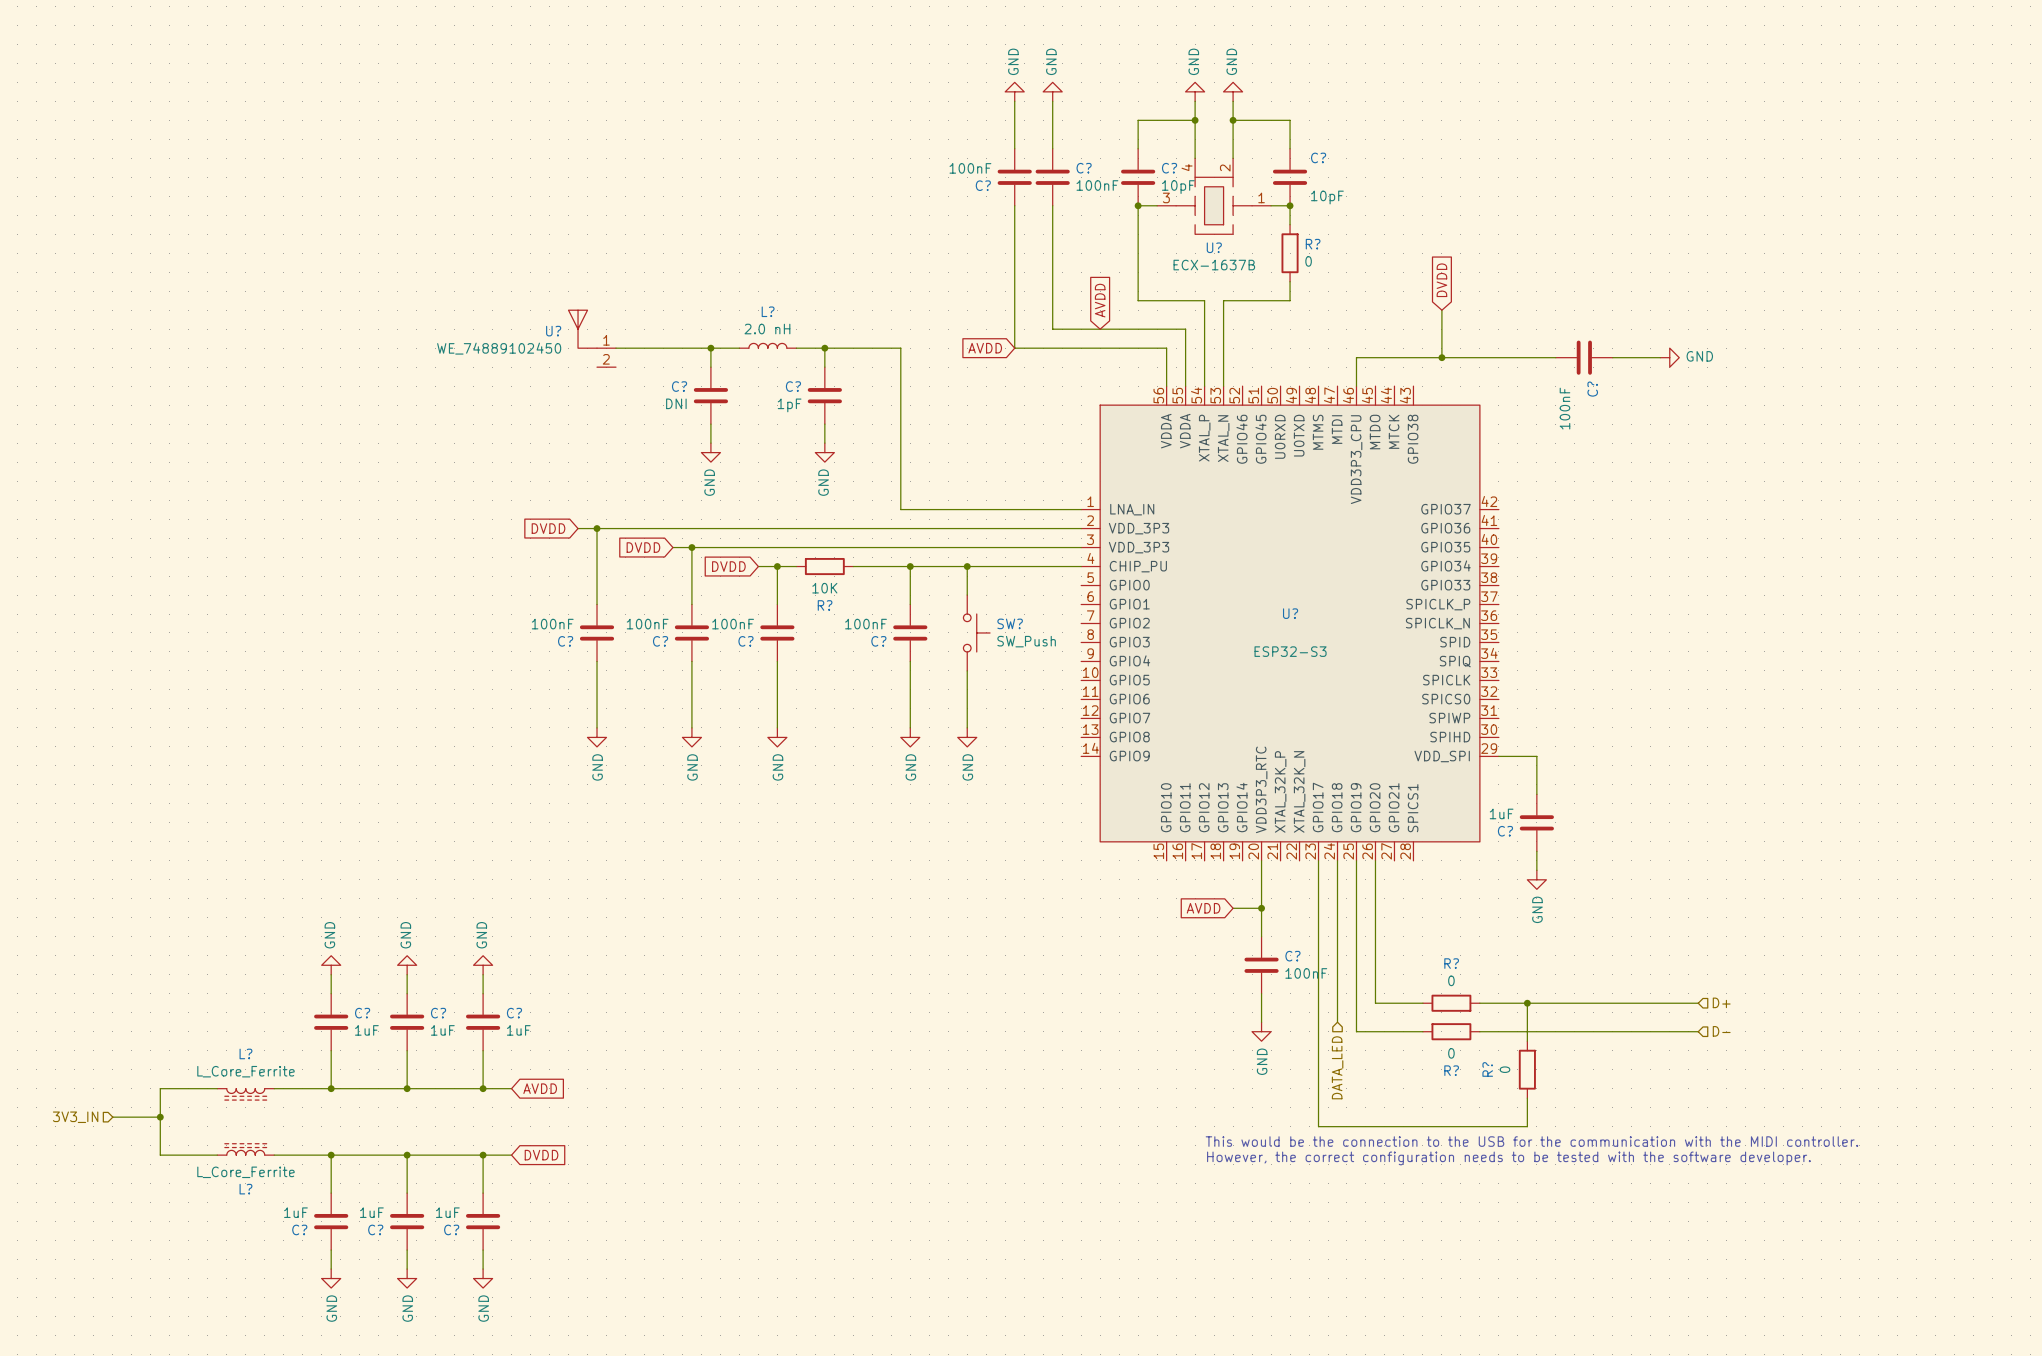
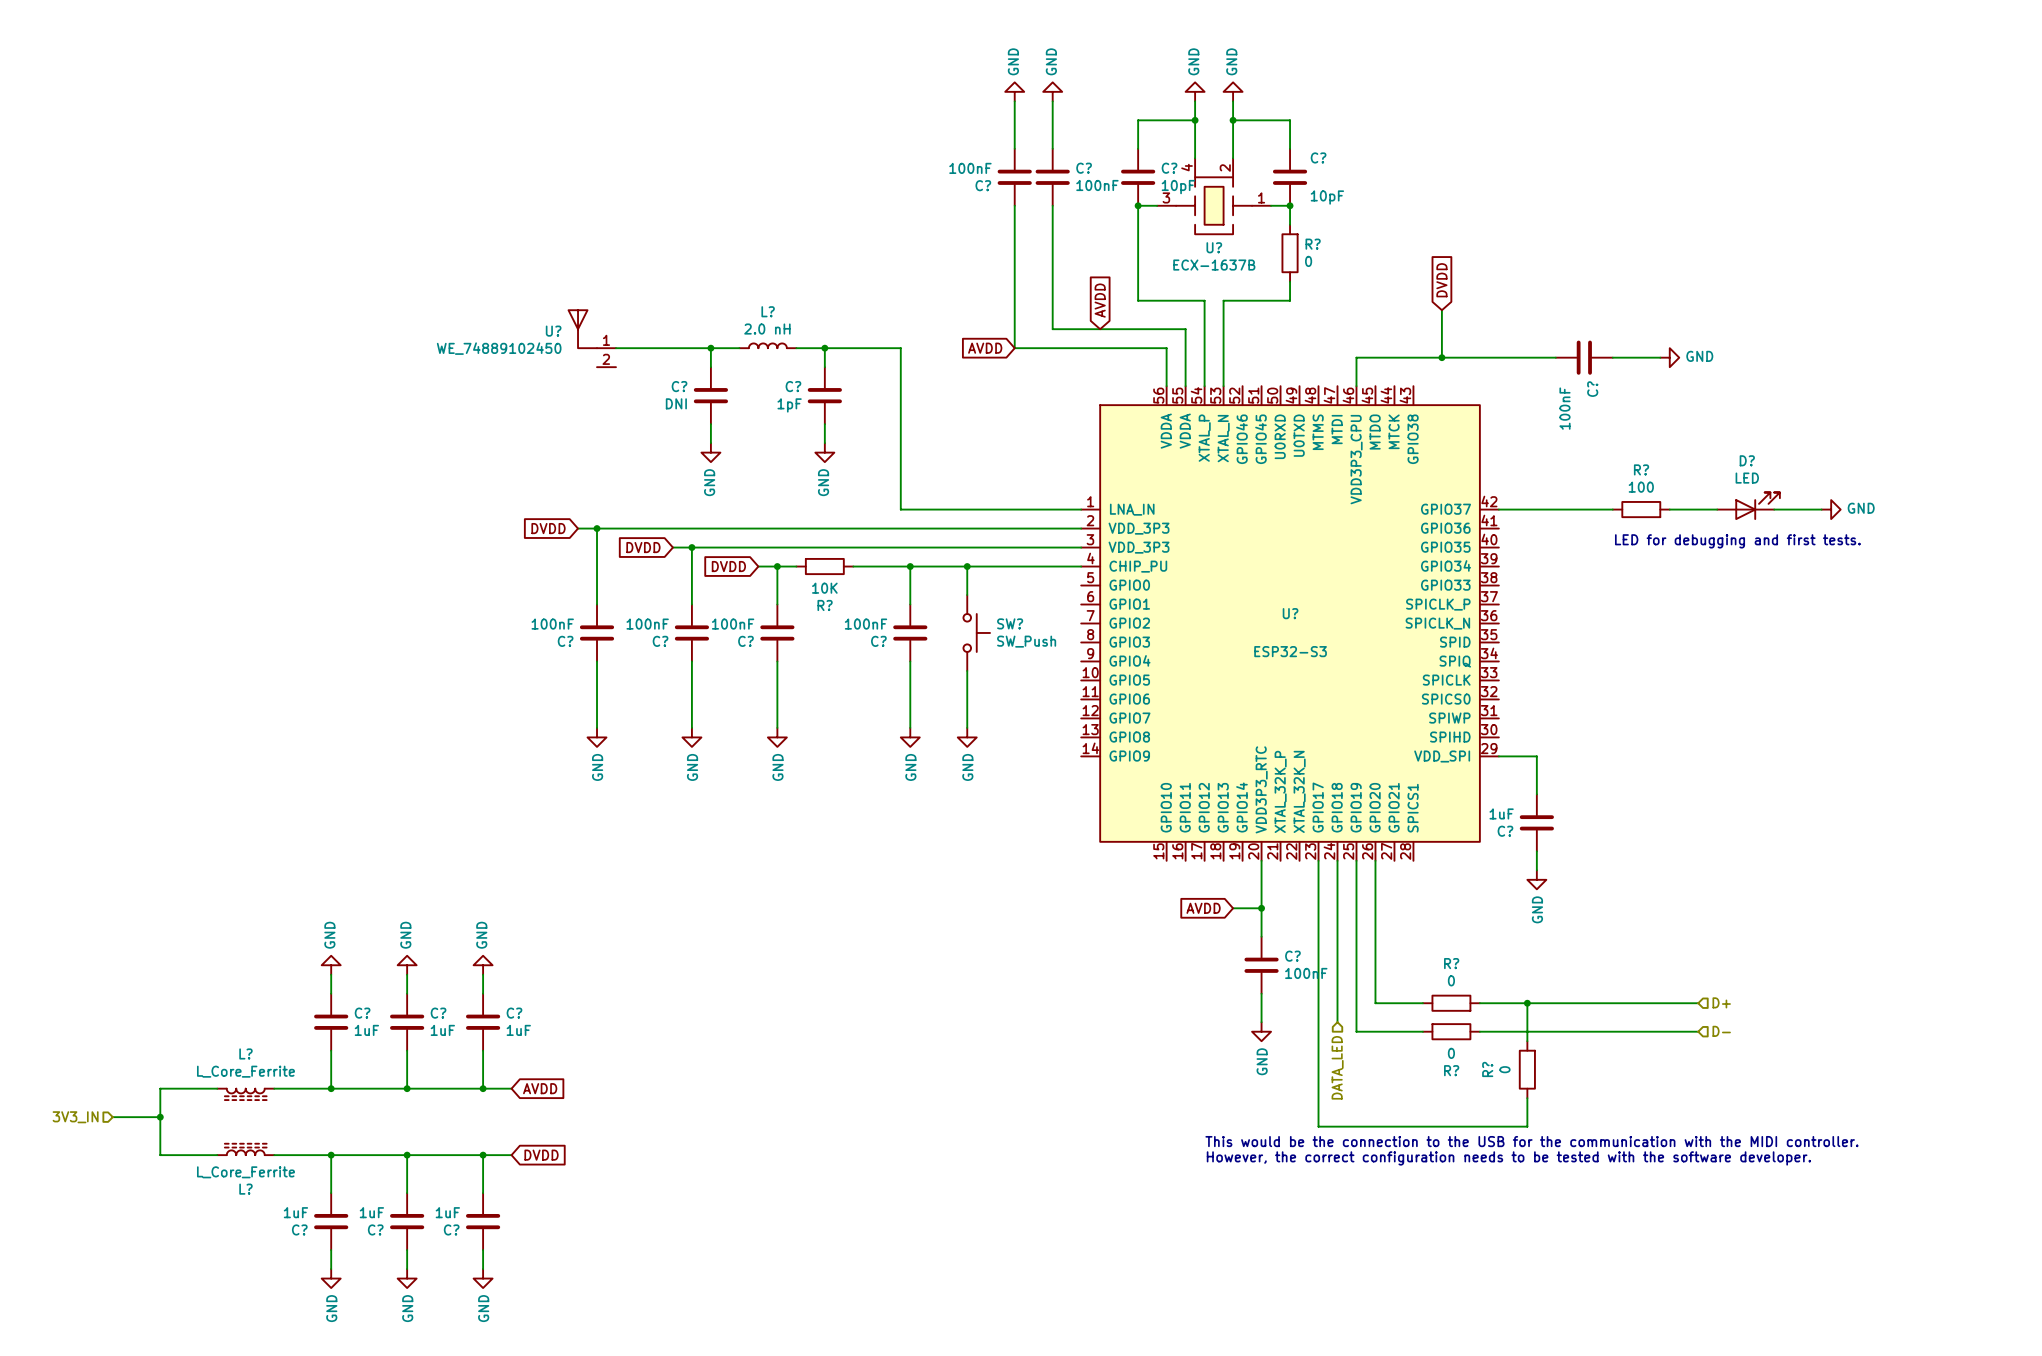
D?: none -> LED (1748, 506)
wire: none -> (1498, 509) (1612, 509)
R?: none -> 100 (1641, 509)
wire: none -> (1669, 509) (1717, 509)
wire: none -> (1774, 509) (1821, 509)
power symbol: none -> GND (1831, 509)
text: none -> LED for debugging and first tests. (1737, 541)

